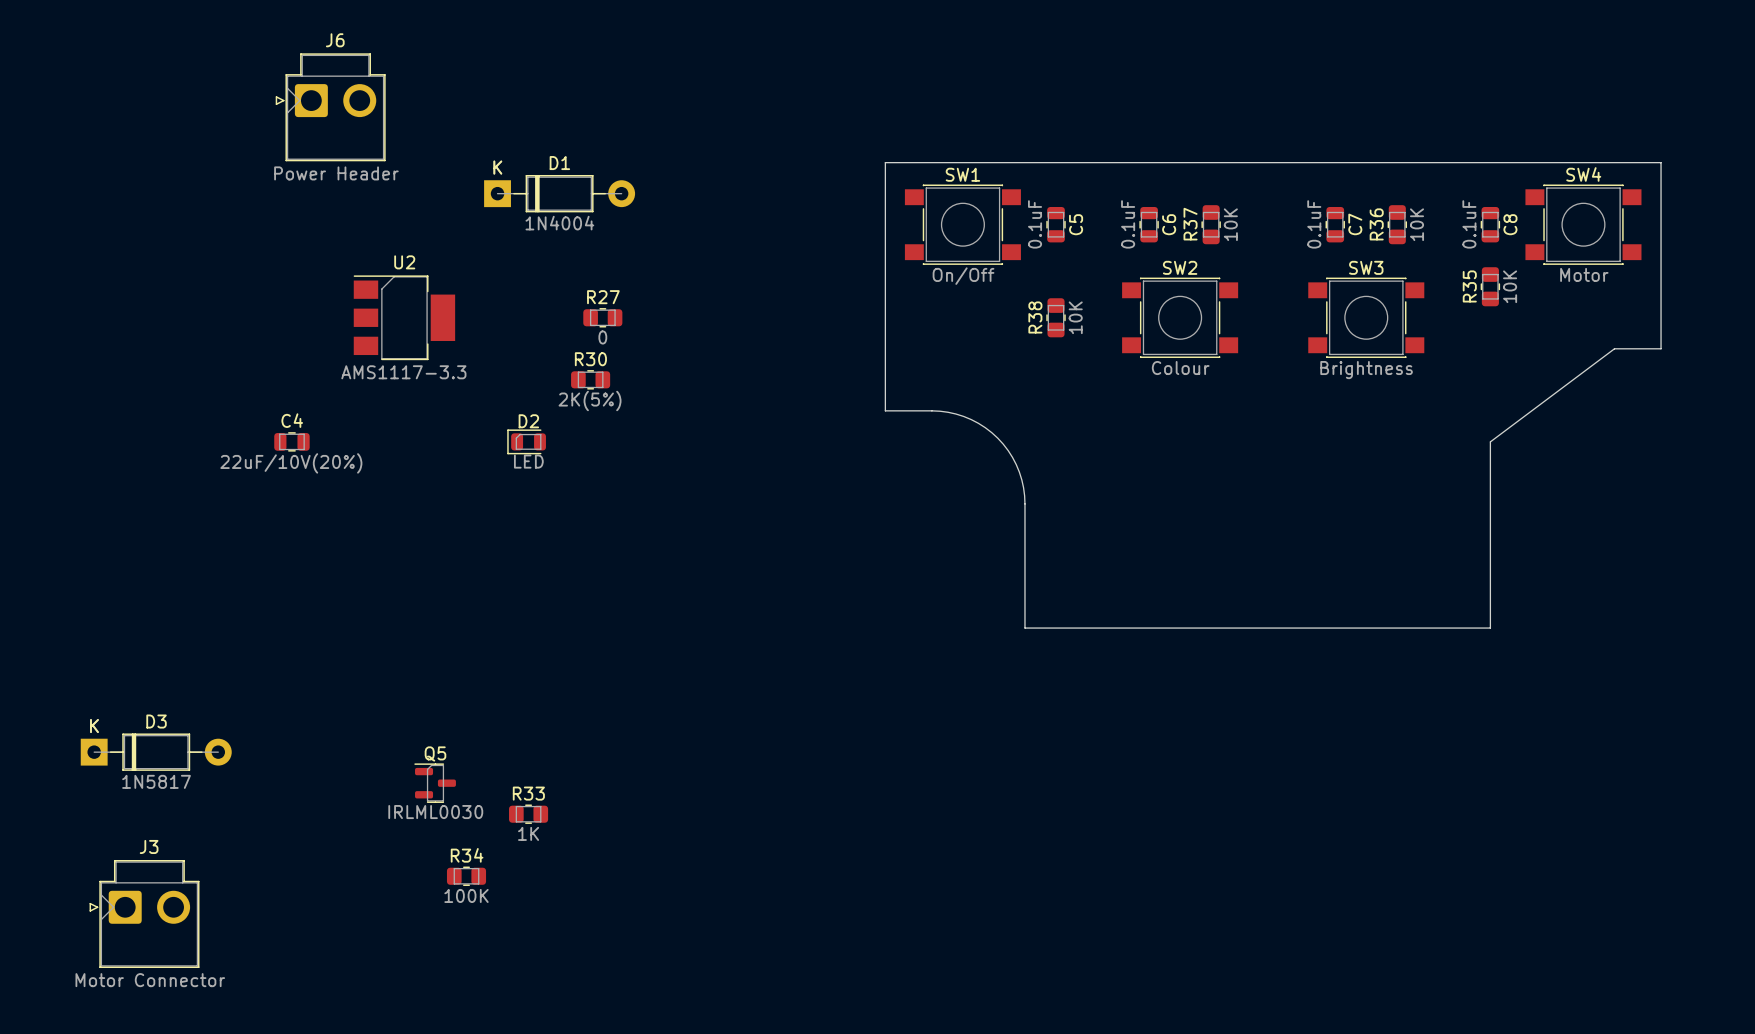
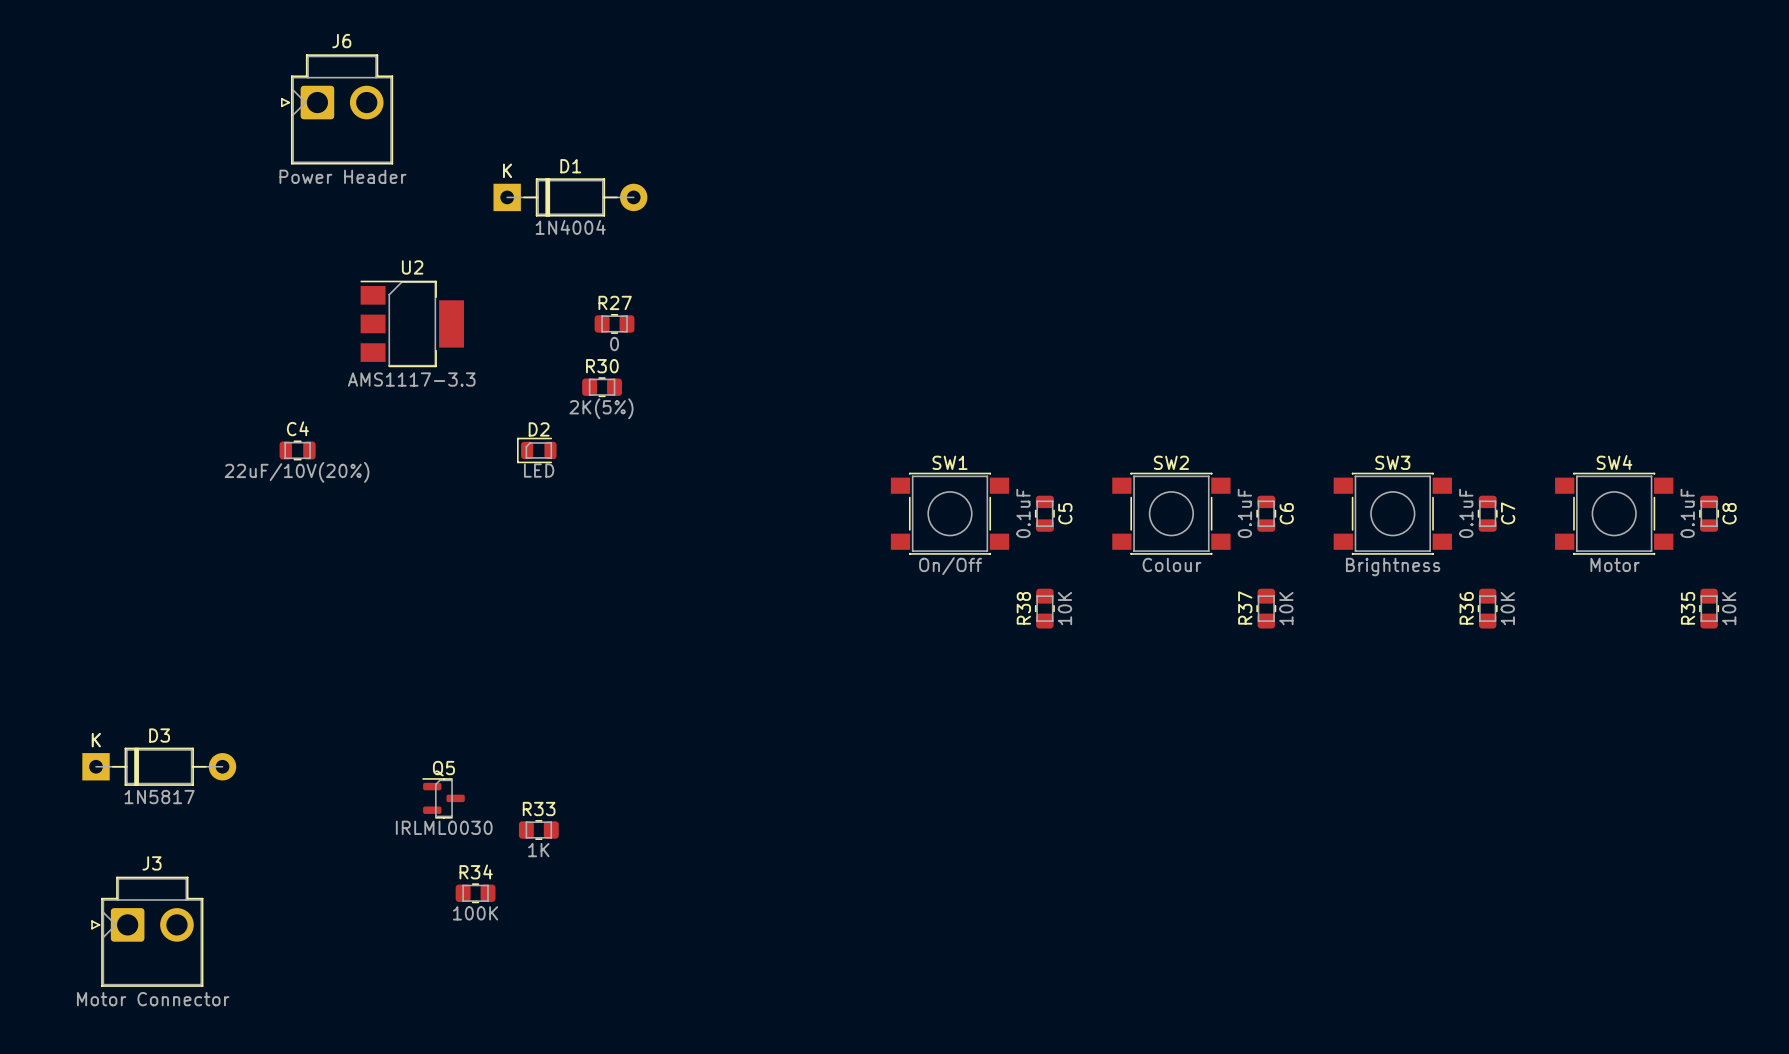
board edge: (885, 162) (1661, 162) (1661, 348) (1614, 348) (1490, 441) (1490, 628) (1024, 628) (1024, 495) (1019, 472) (1008, 450) (985, 427) (963, 416) (940, 411) (885, 410) (885, 162) -> none
SW1 position: (962, 224) -> (950, 513)
C5 position: (1056, 224) -> (1044, 513)
C6 position: (1149, 224) -> (1266, 513)
R37 position: (1211, 224) -> (1266, 608)
C7 position: (1335, 224) -> (1487, 513)
R36 position: (1397, 224) -> (1487, 608)
C8 position: (1490, 224) -> (1709, 513)
SW4 position: (1583, 224) -> (1614, 513)
R35 position: (1490, 286) -> (1709, 608)
R38 position: (1056, 317) -> (1044, 608)
SW2 position: (1180, 317) -> (1171, 513)
SW3 position: (1366, 317) -> (1392, 513)

